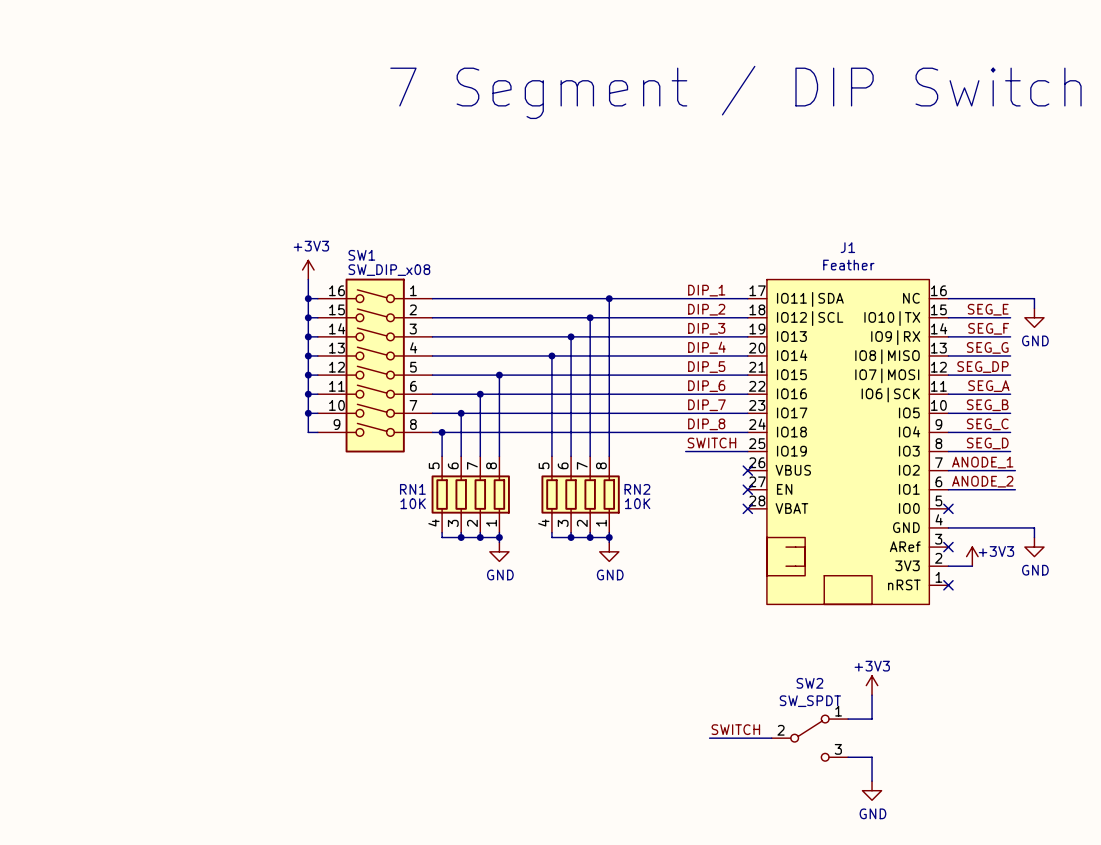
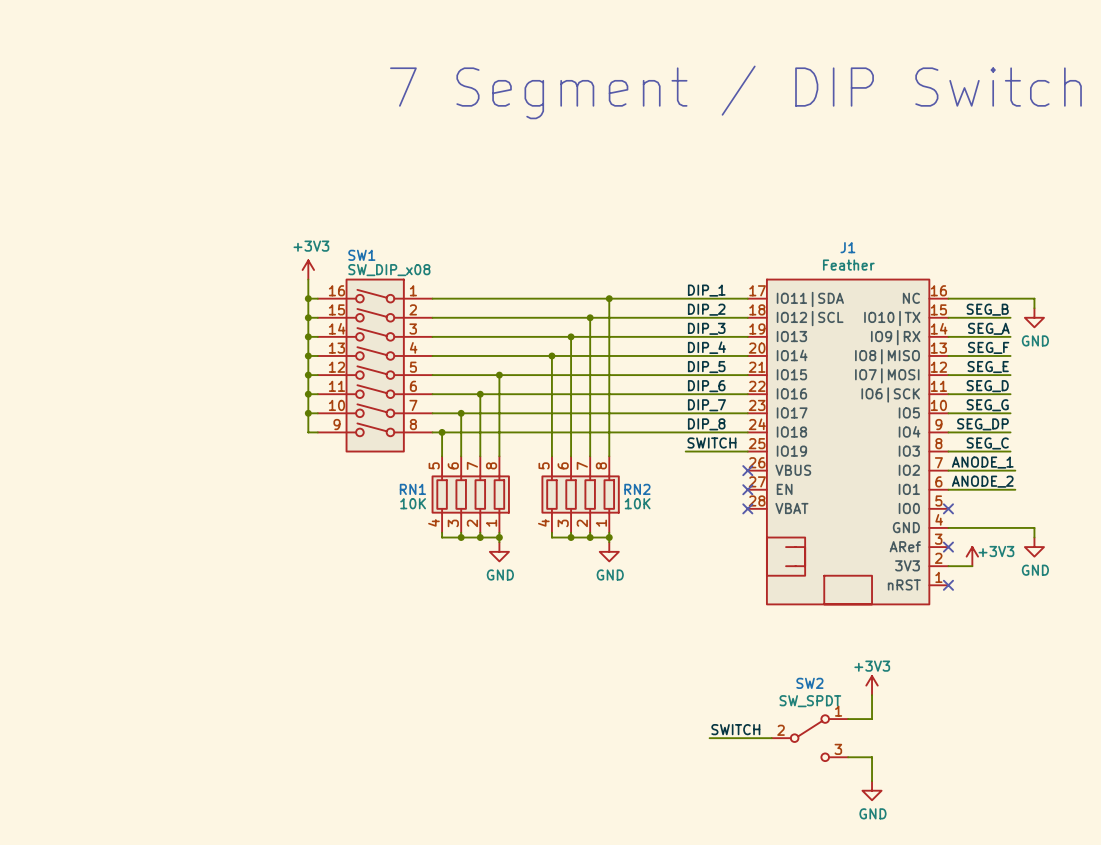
label: SEG_E (988, 309) -> SEG_B (987, 309)
label: SEG_F (988, 328) -> SEG_A (988, 328)
label: SEG_G (987, 347) -> SEG_F (988, 347)
label: SEG_DP (982, 367) -> SEG_E (988, 367)
label: SEG_A (988, 386) -> SEG_D (987, 386)
label: SEG_B (987, 405) -> SEG_G (987, 405)
label: SEG_C (987, 424) -> SEG_DP (982, 424)
label: SEG_D (987, 443) -> SEG_C (987, 443)

